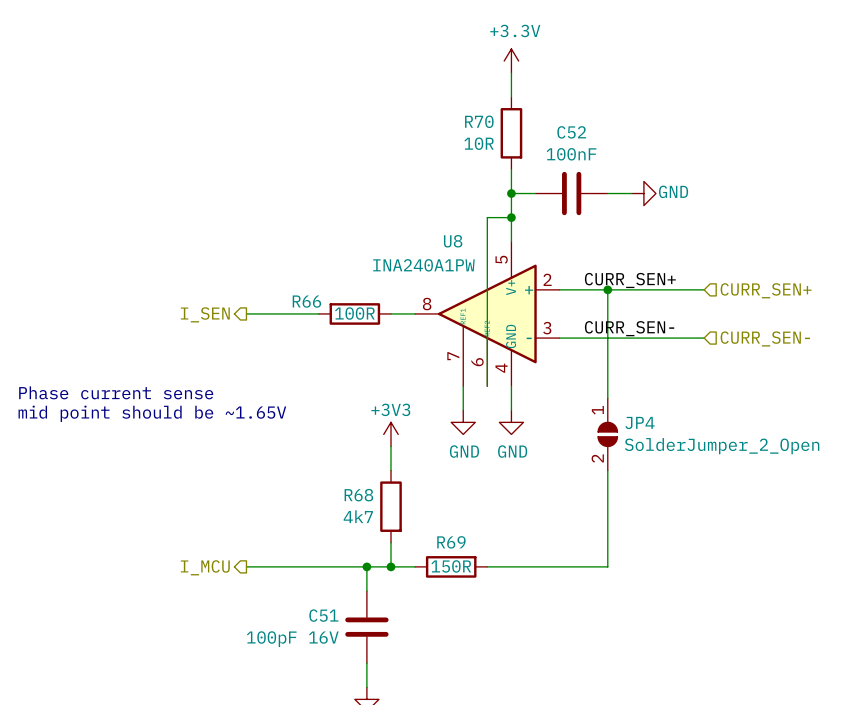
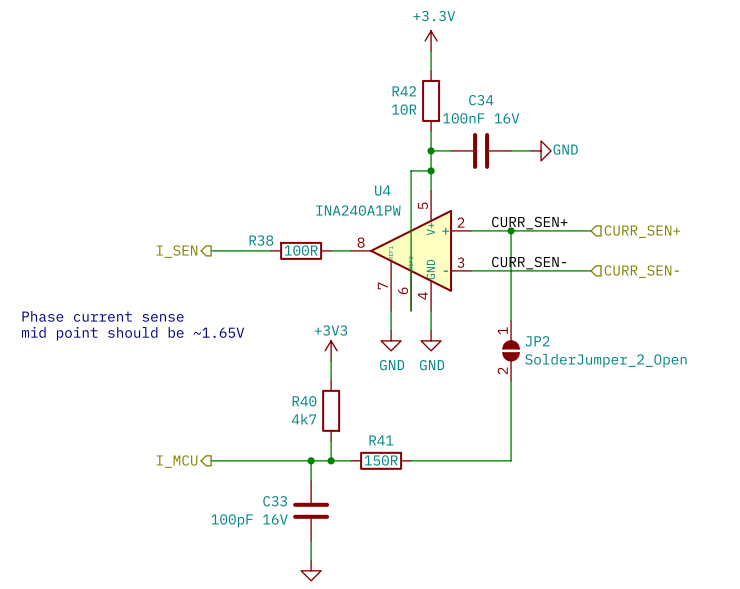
R70 name: R70 (479, 121) -> R42 (404, 91)
C52 name: C52 (571, 132) -> C34 (481, 100)
C52 value: 100nF (571, 154) -> 100nF 16V (481, 118)
U8 name: U8 (453, 241) -> U4 (382, 190)
R66 name: R66 (306, 301) -> R38 (261, 240)
JP4 name: JP4 (640, 422) -> JP2 (537, 341)
R68 name: R68 (358, 495) -> R40 (304, 401)
R69 name: R69 (451, 542) -> R41 (381, 440)
C51 name: C51 (323, 615) -> C33 (275, 501)

